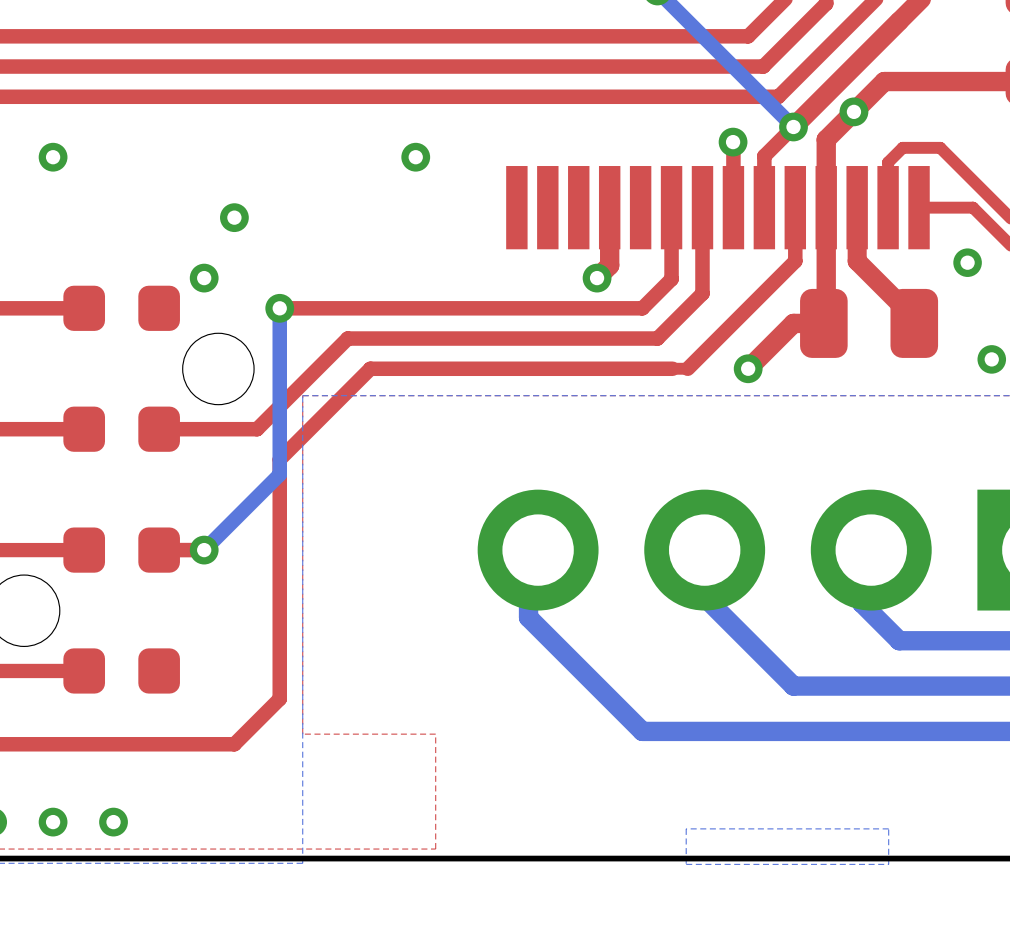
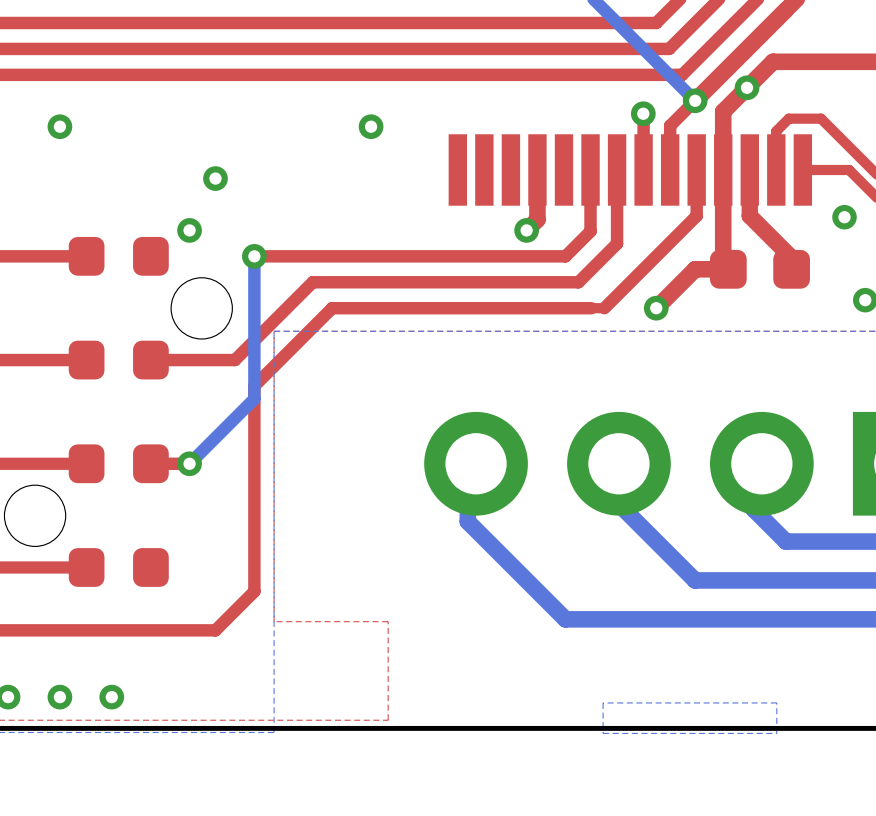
part footprint: [800, 288, 939, 358] -> [709, 249, 810, 289]

